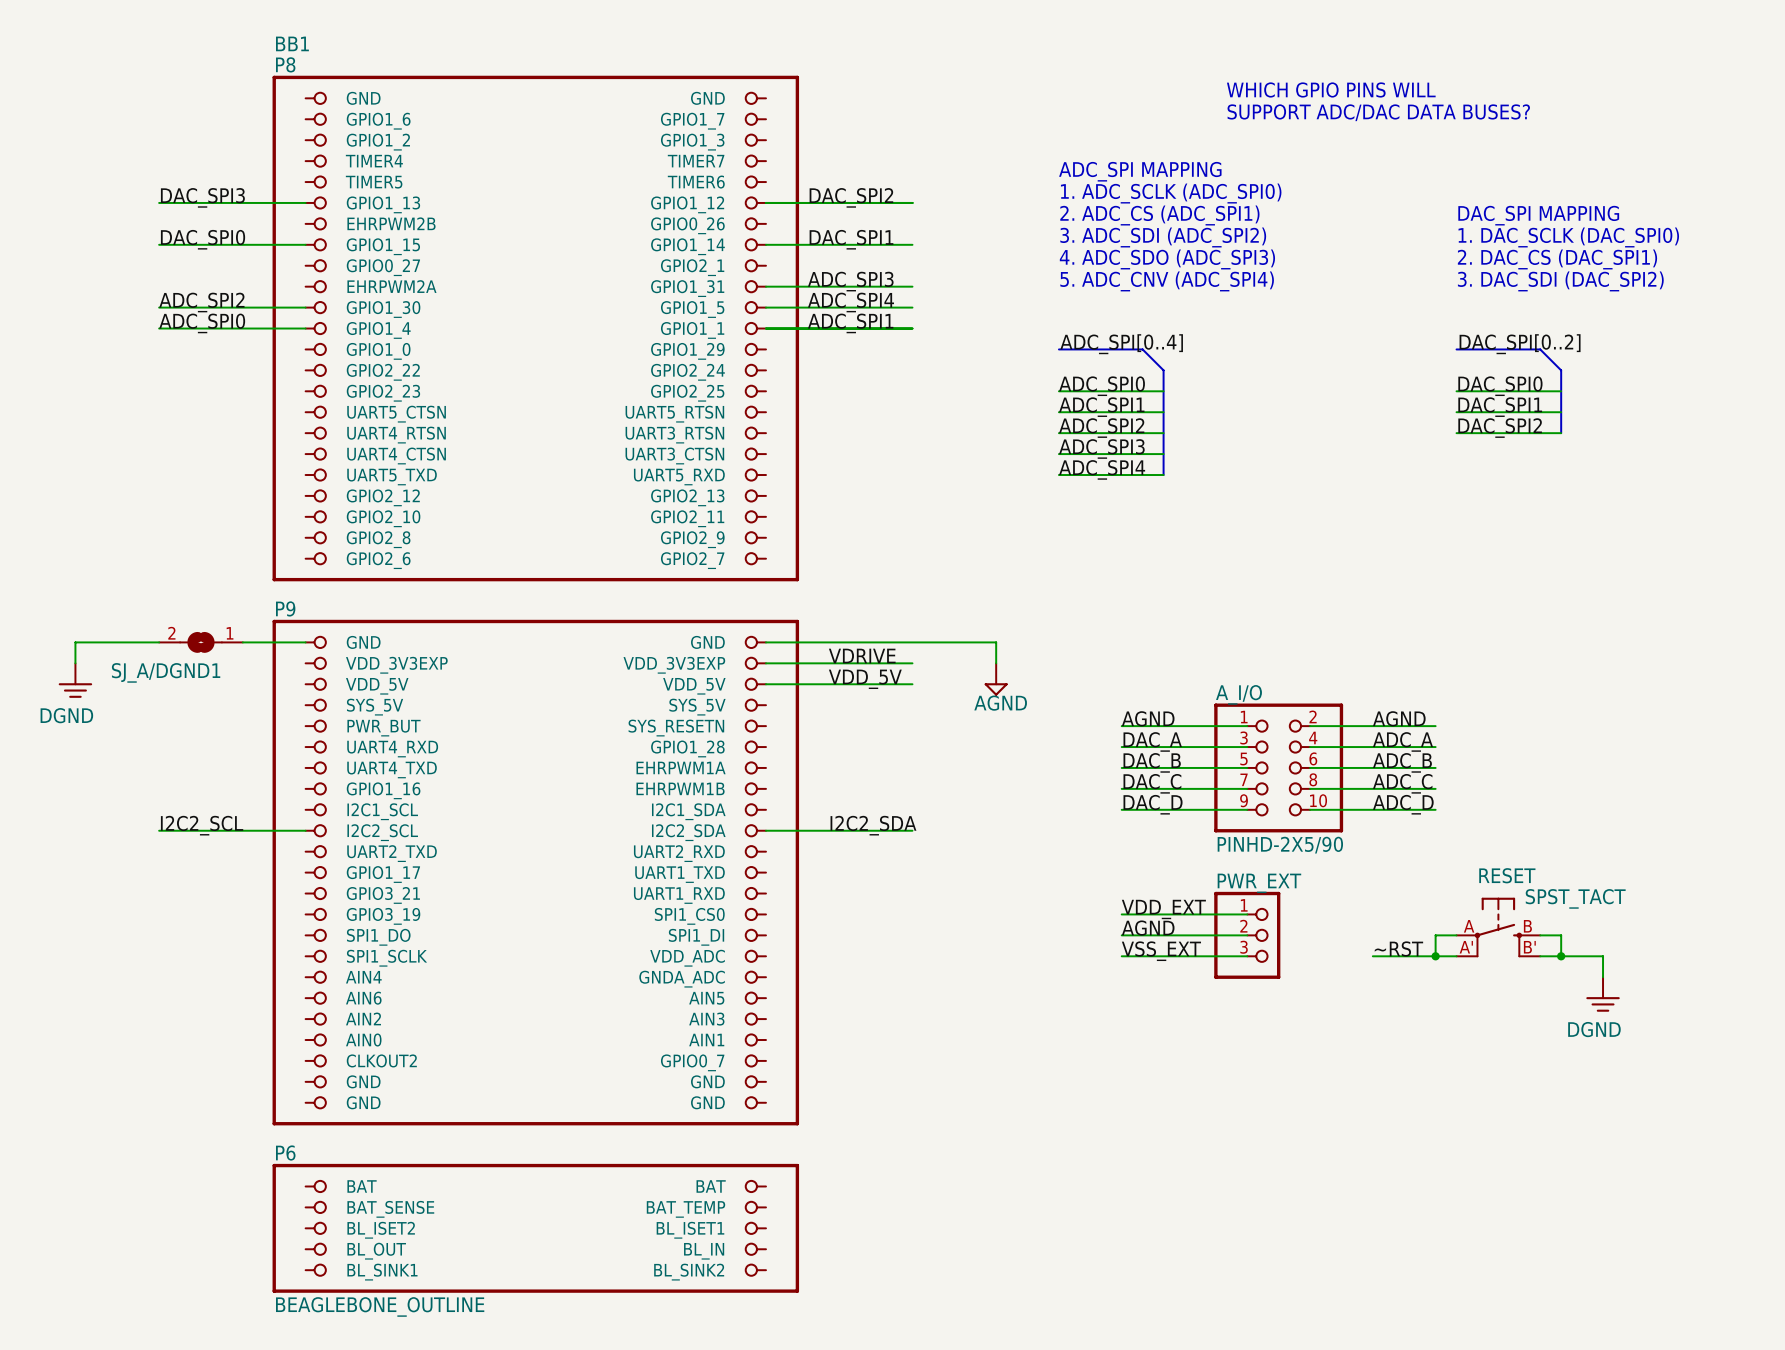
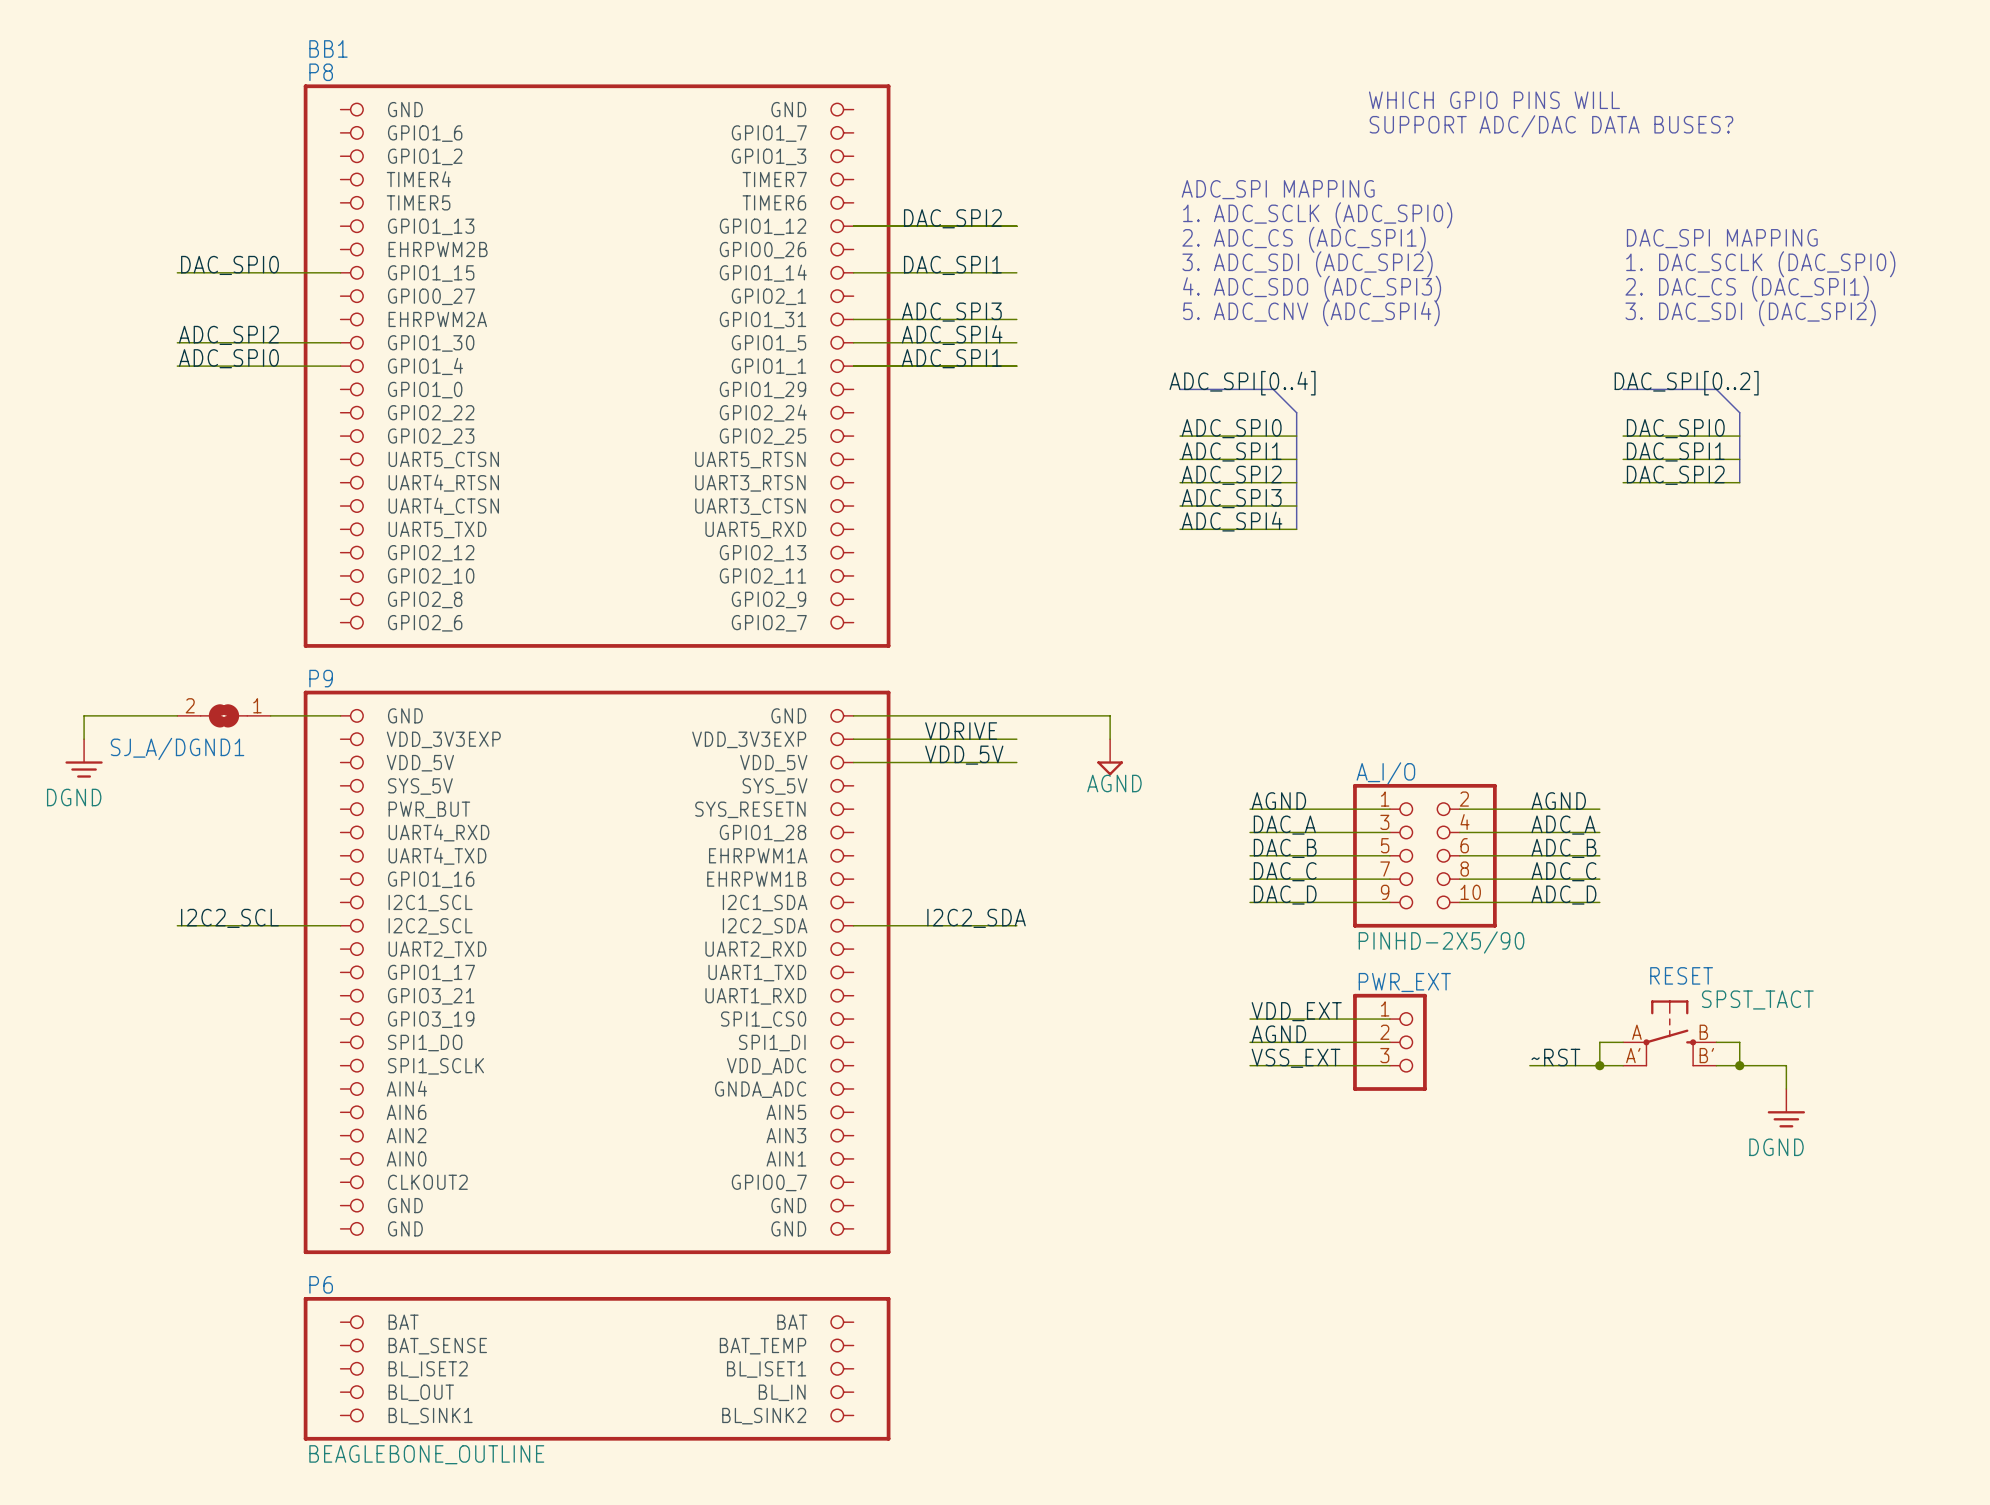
label: DAC_SPI3 (202, 197) -> none
wire: (159, 202) (305, 202) -> none

